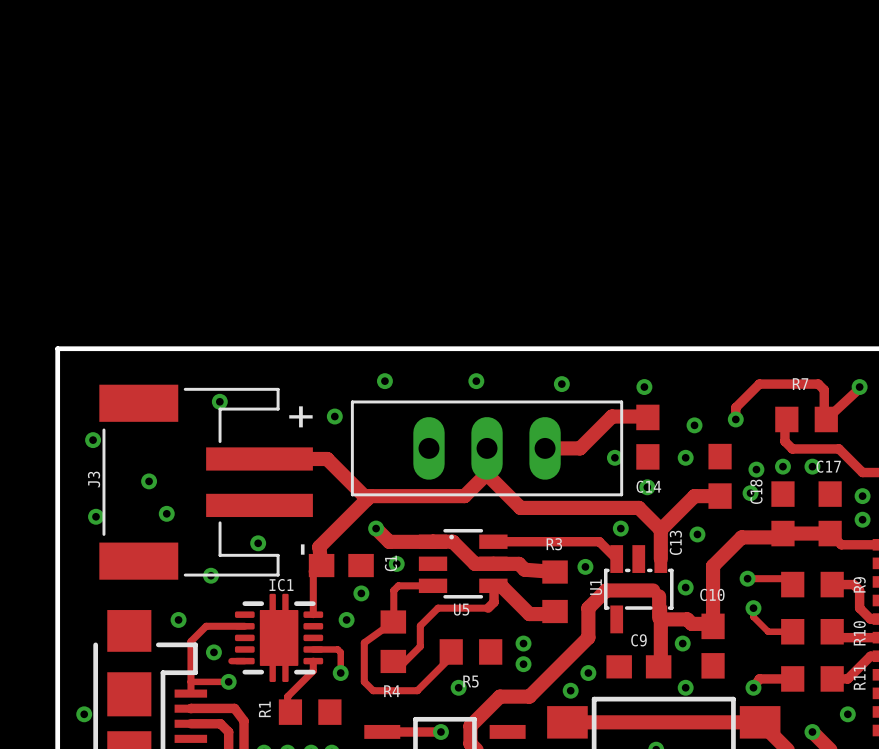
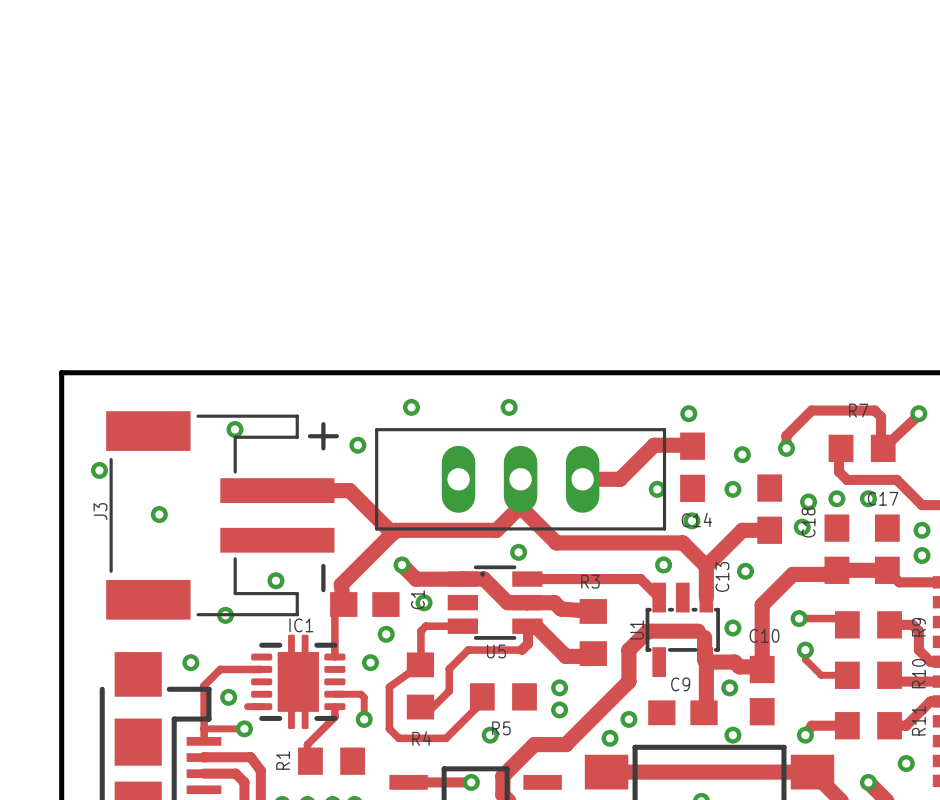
via: (561, 384) -> none
via: (166, 513) -> none
via: (96, 516) -> none
via: none -> (518, 552)
via: (585, 566) -> none
via: (84, 714) -> none

